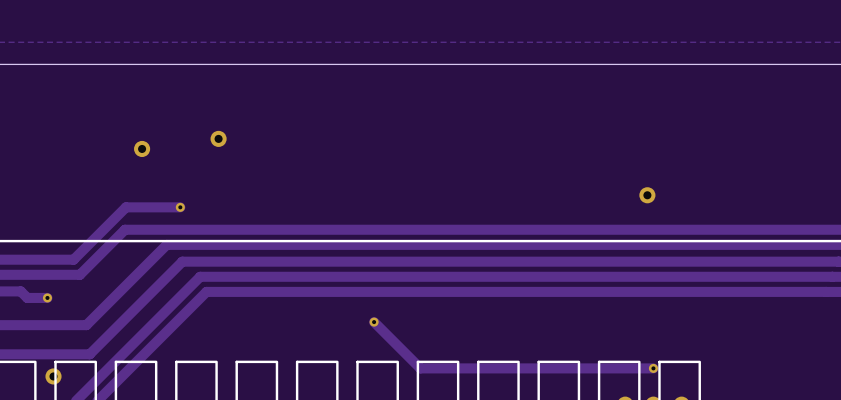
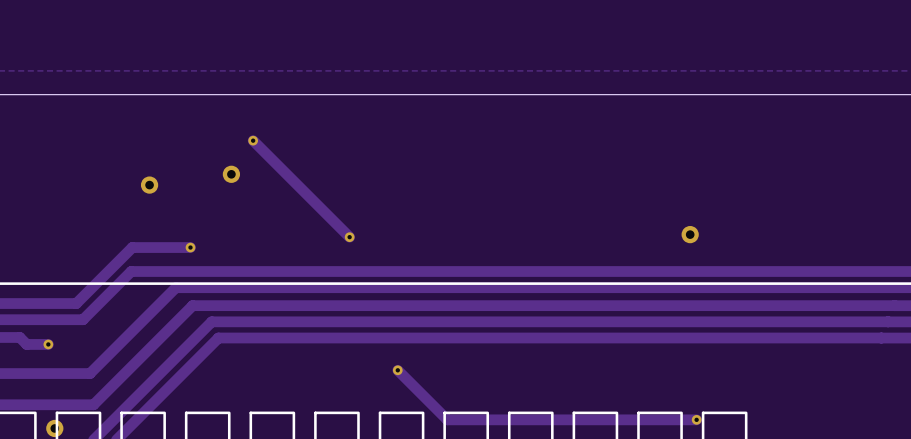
track: none -> (253, 140) (349, 237)
via: none -> (253, 140)
via: none -> (349, 237)

